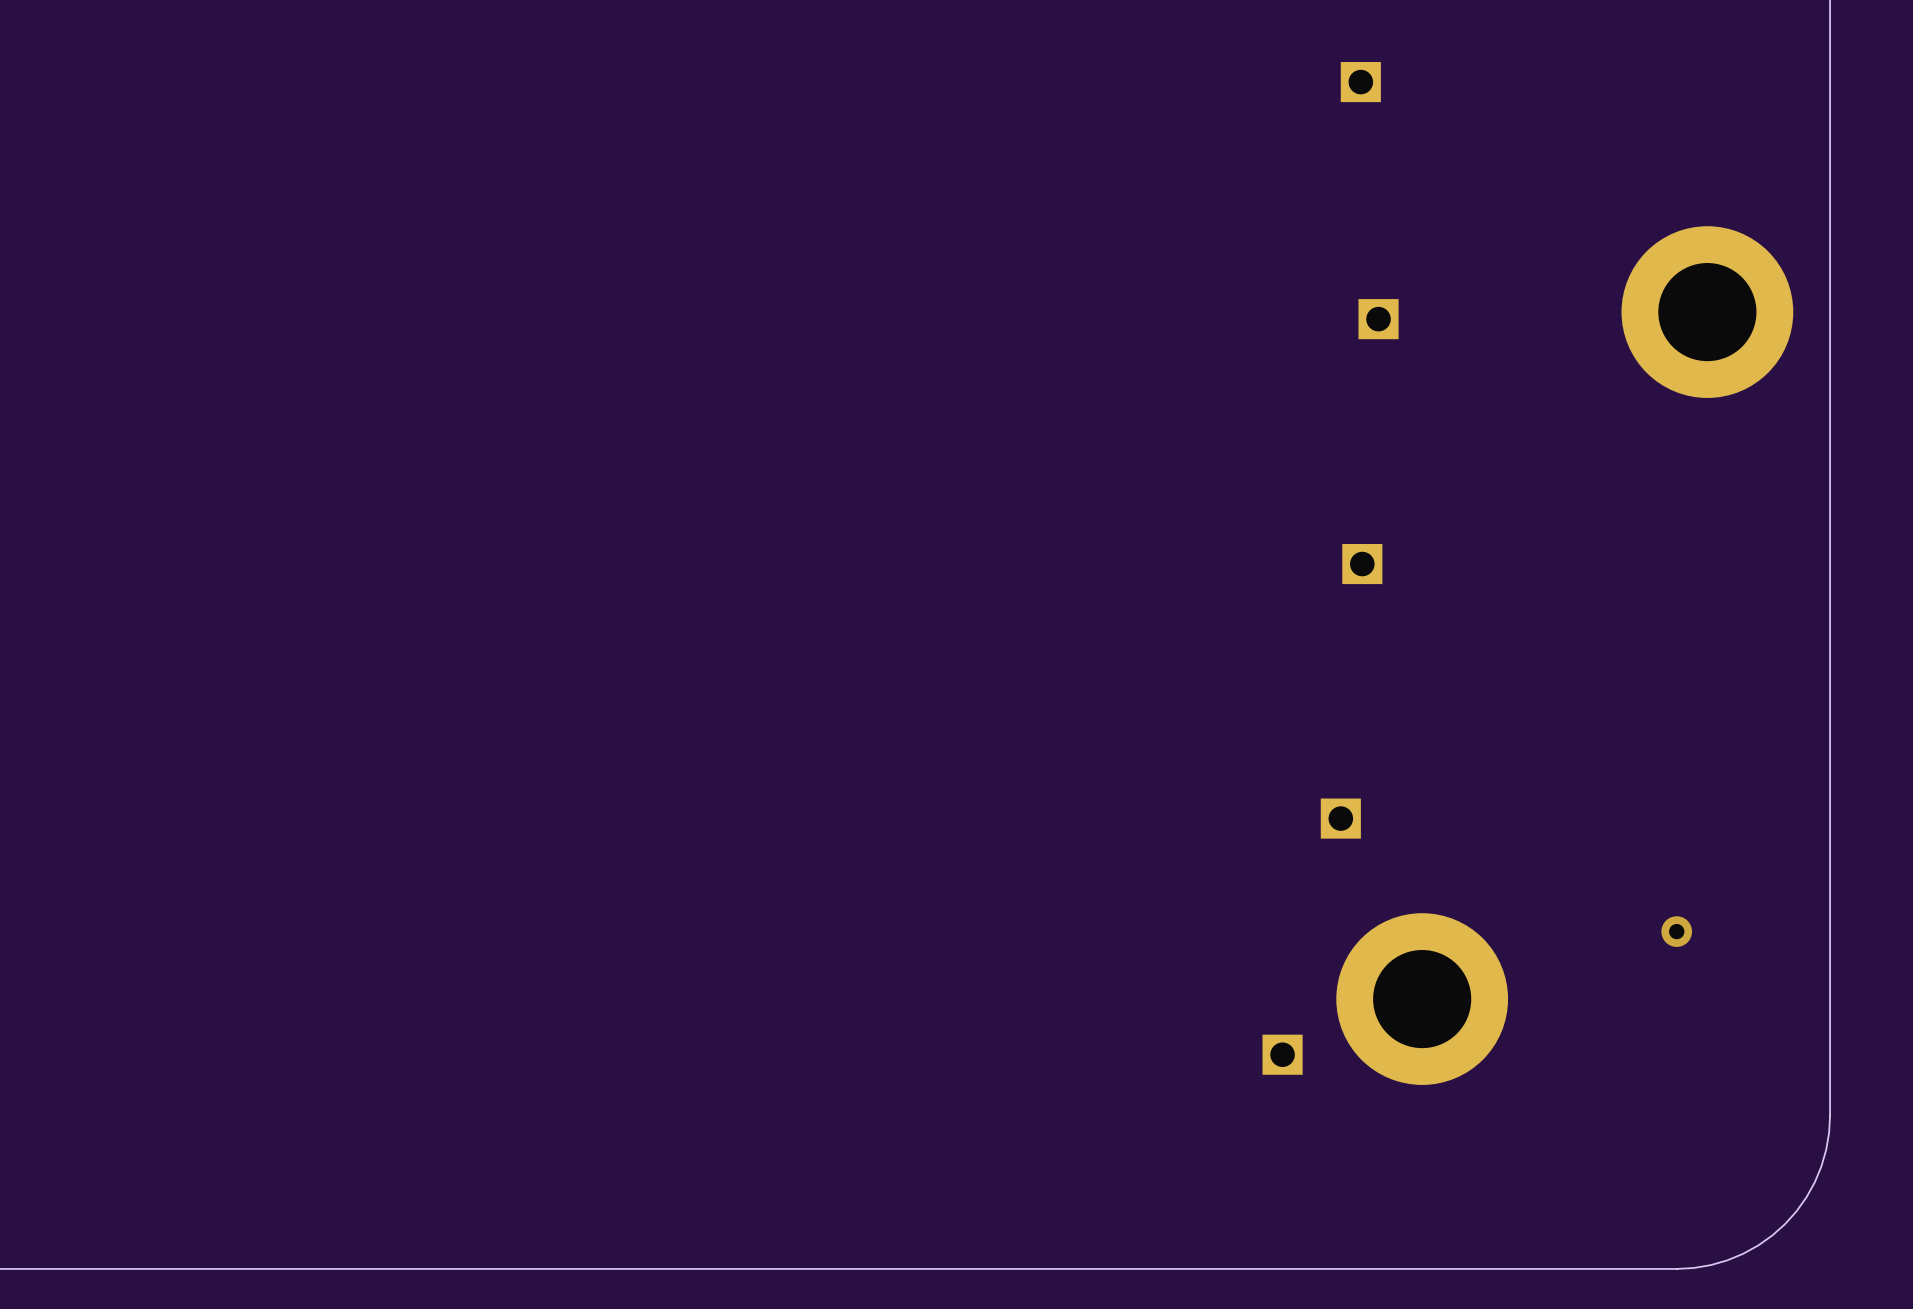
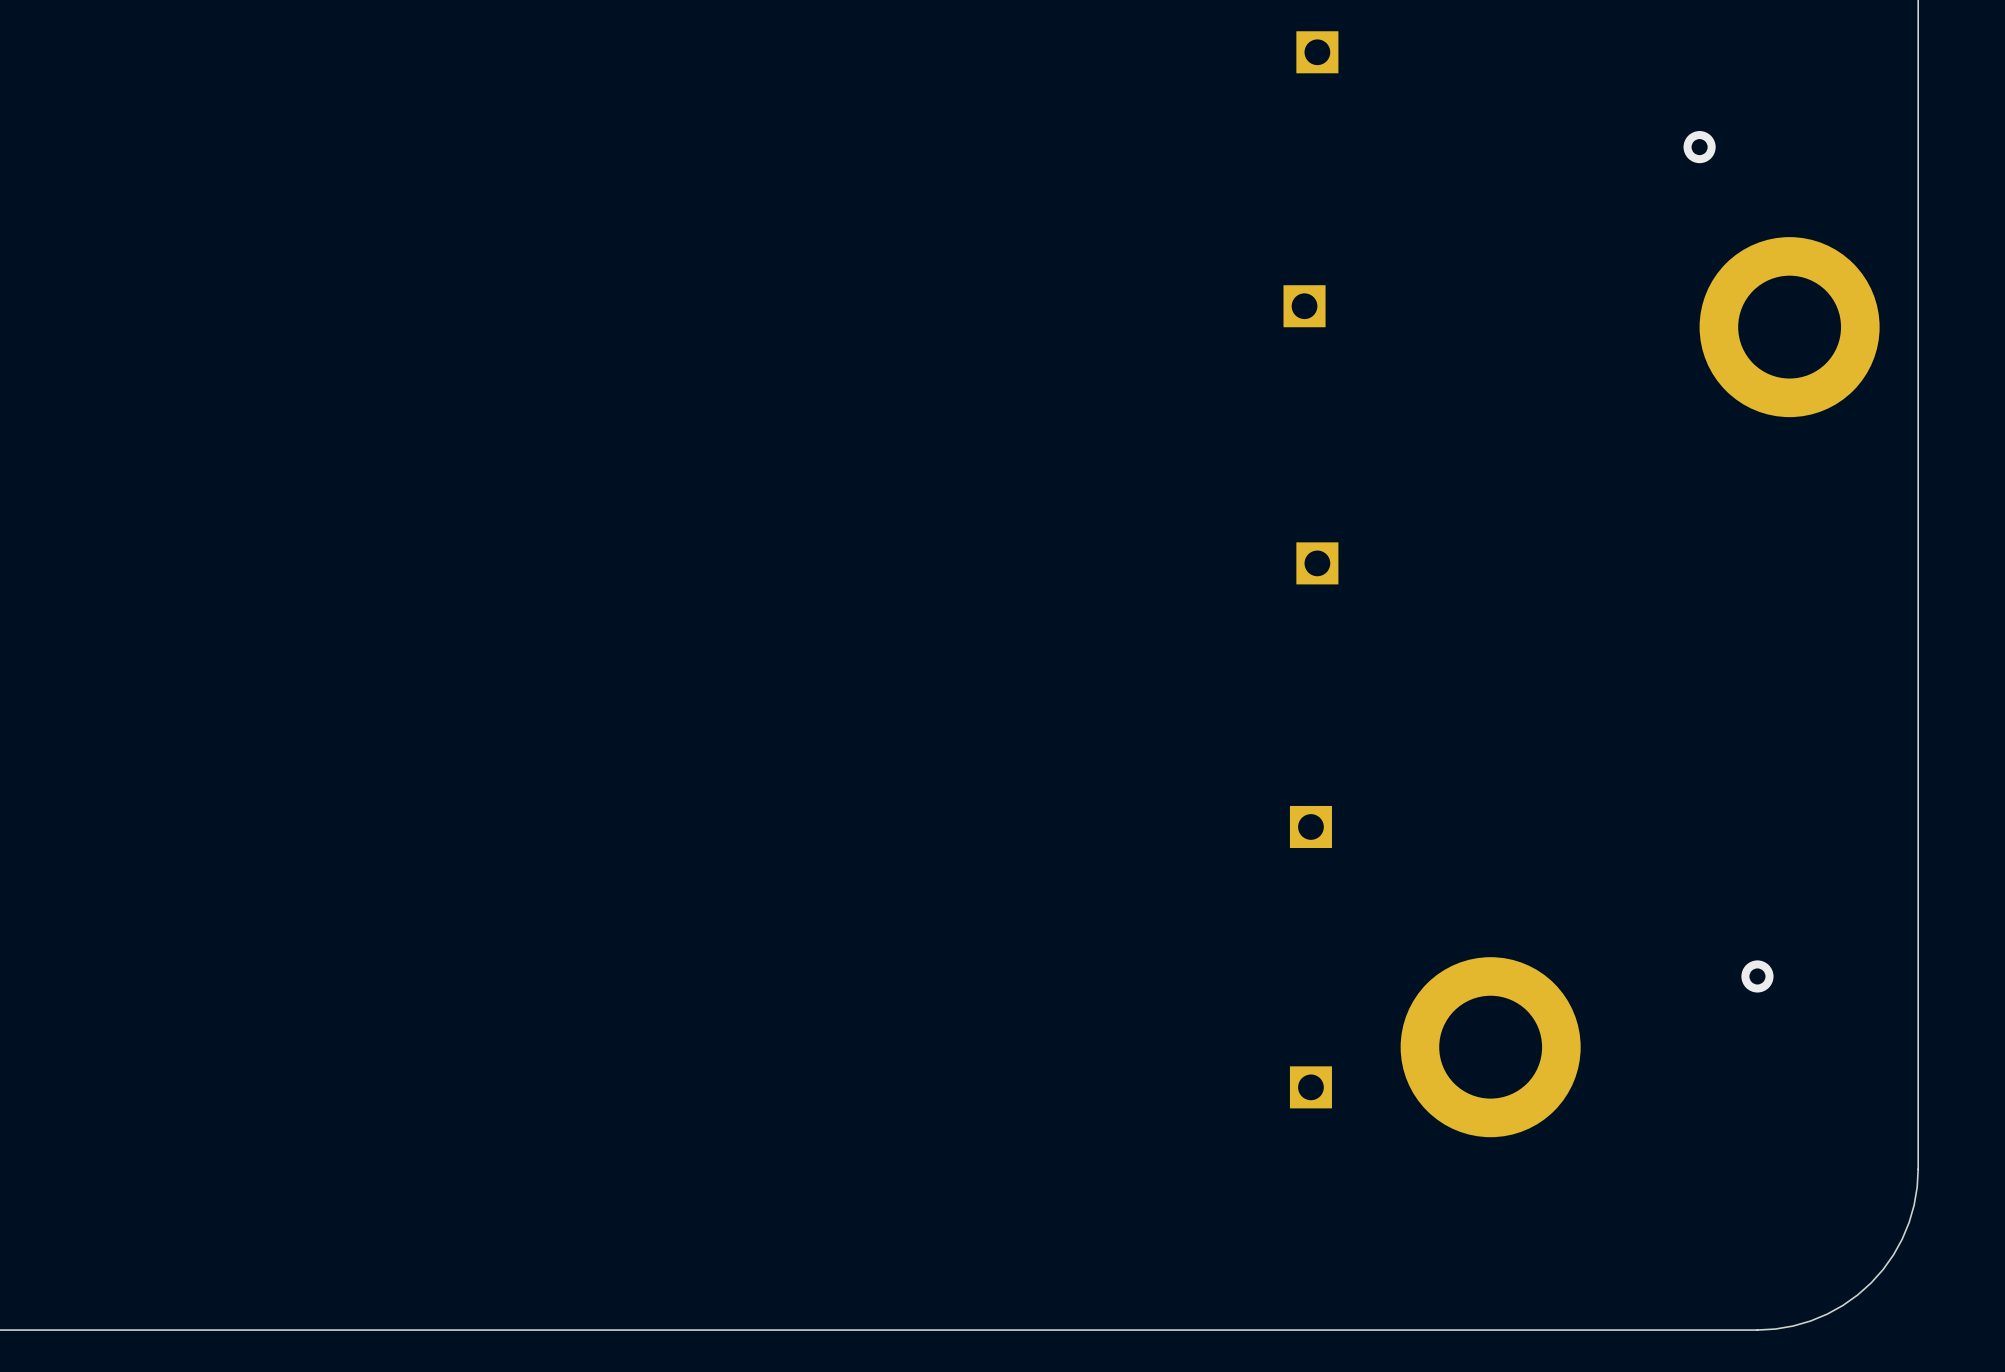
part position: (1360, 82) -> (1317, 52)
via: none -> (1699, 147)
part: none -> (1304, 306)
part: (1378, 319) -> none
part position: (1362, 564) -> (1317, 563)
part position: (1340, 818) -> (1310, 826)
part position: (1282, 1054) -> (1310, 1087)

